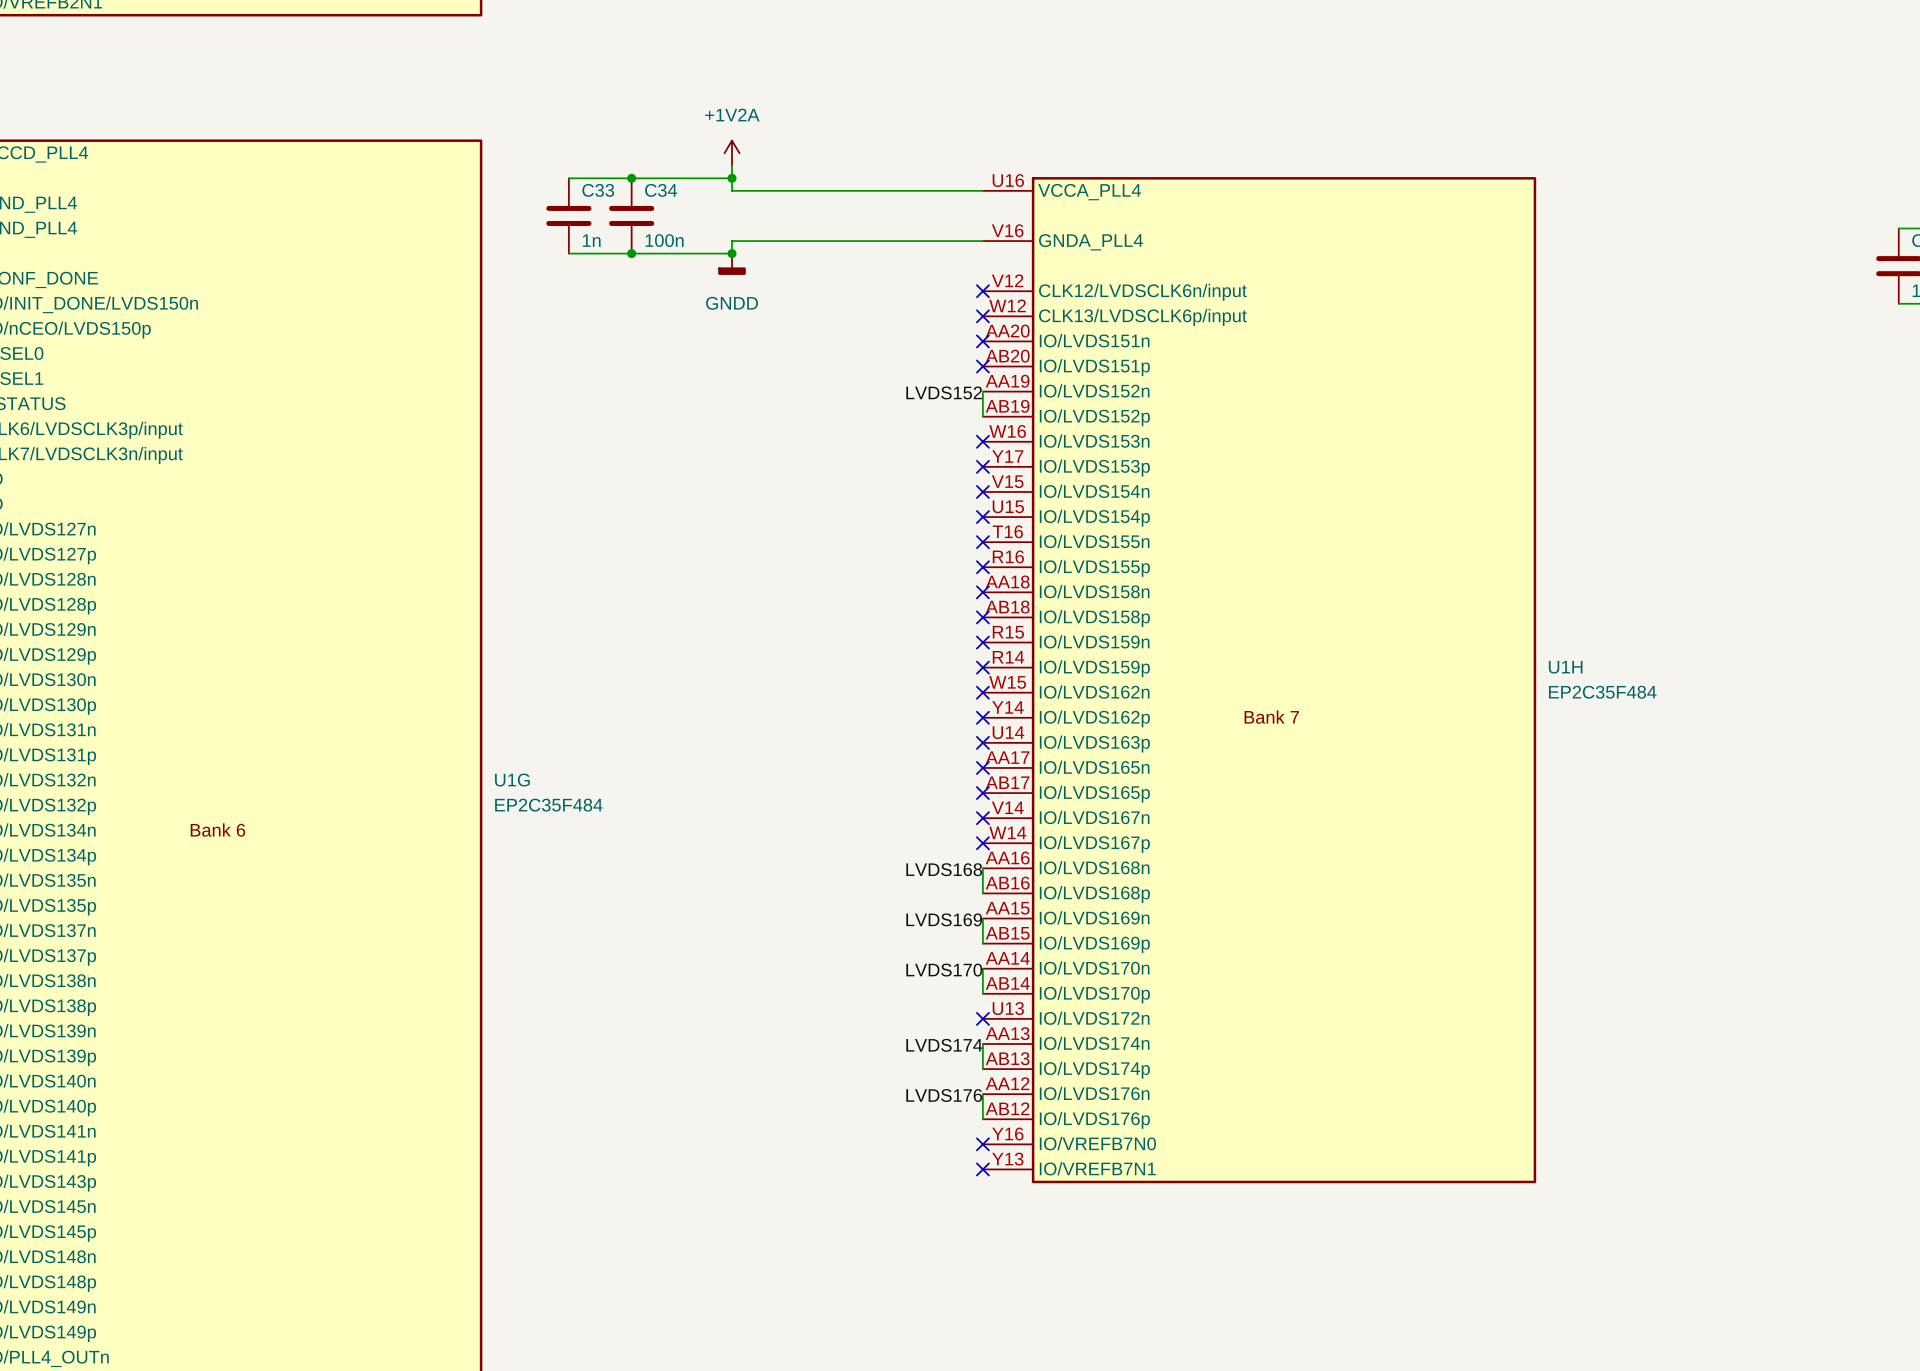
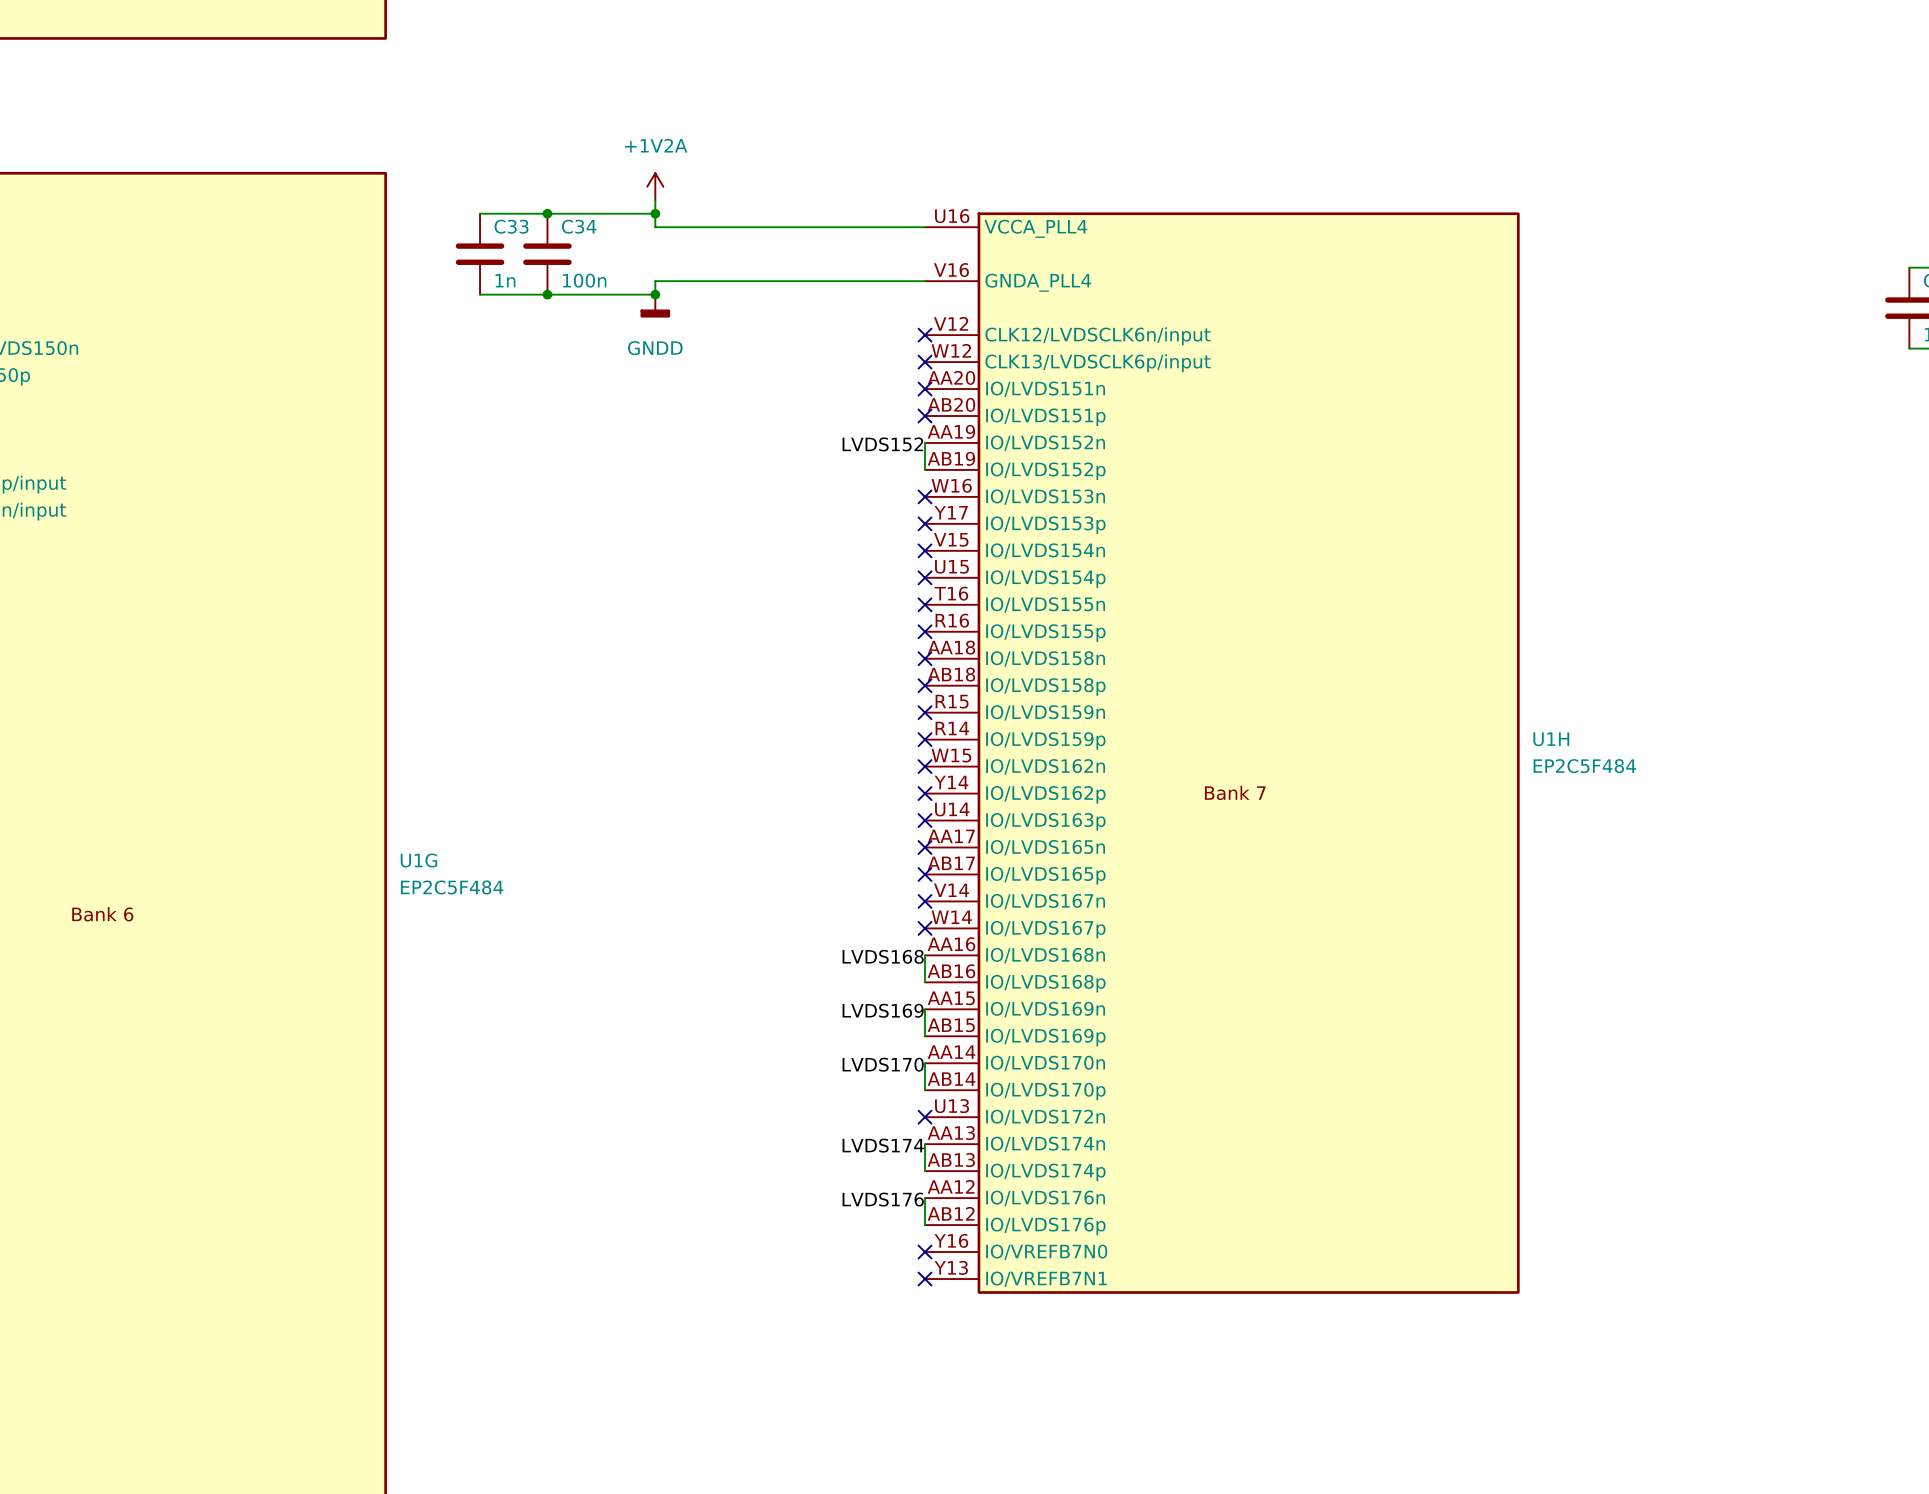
U1H value: EP2C35F484 (1602, 692) -> EP2C5F484 (1584, 766)
U1G value: EP2C35F484 (548, 805) -> EP2C5F484 (452, 887)

